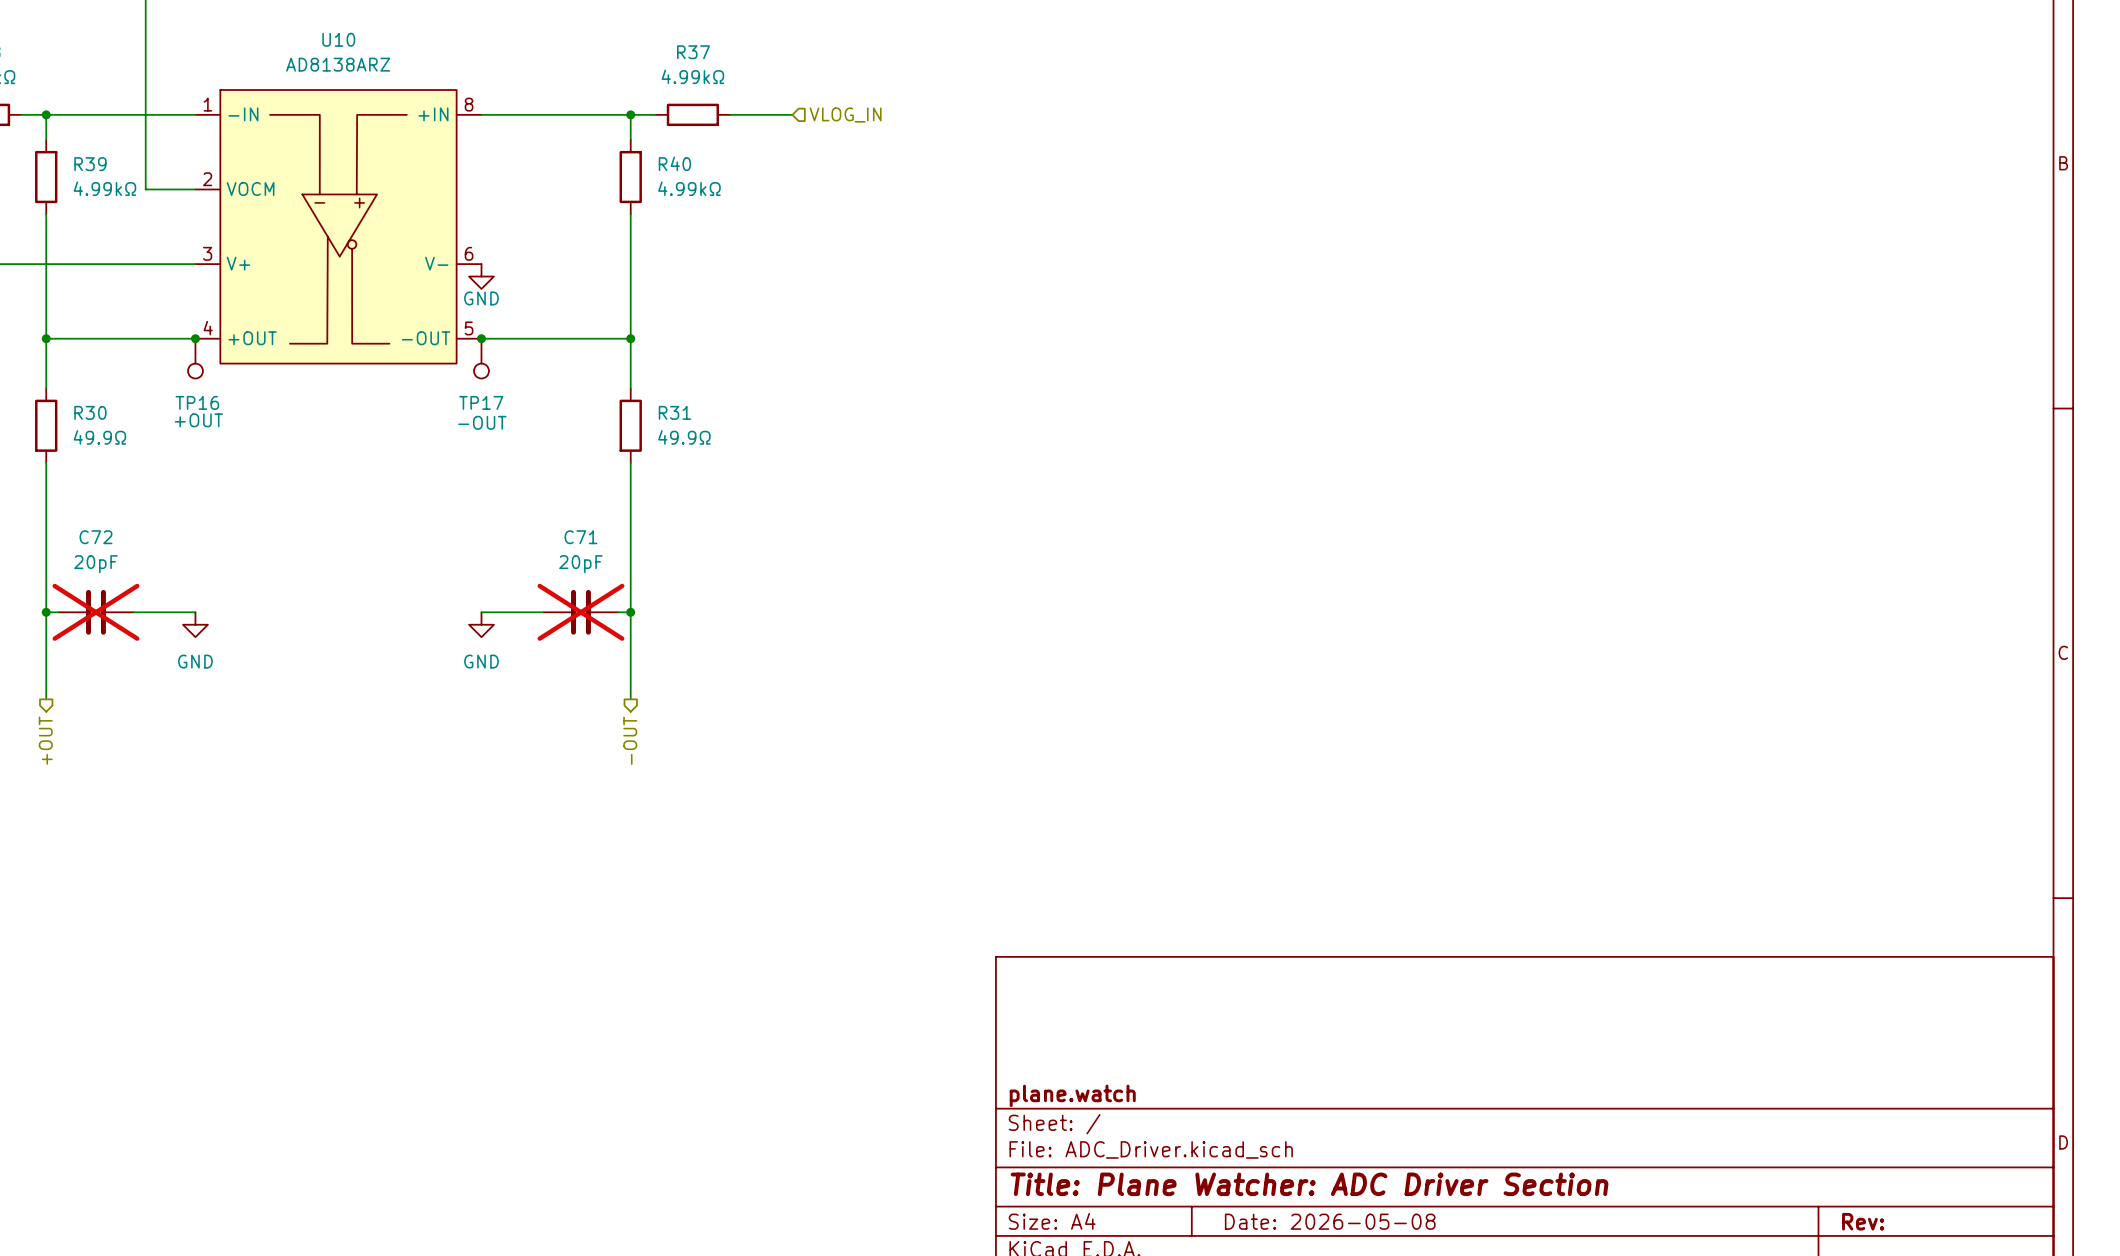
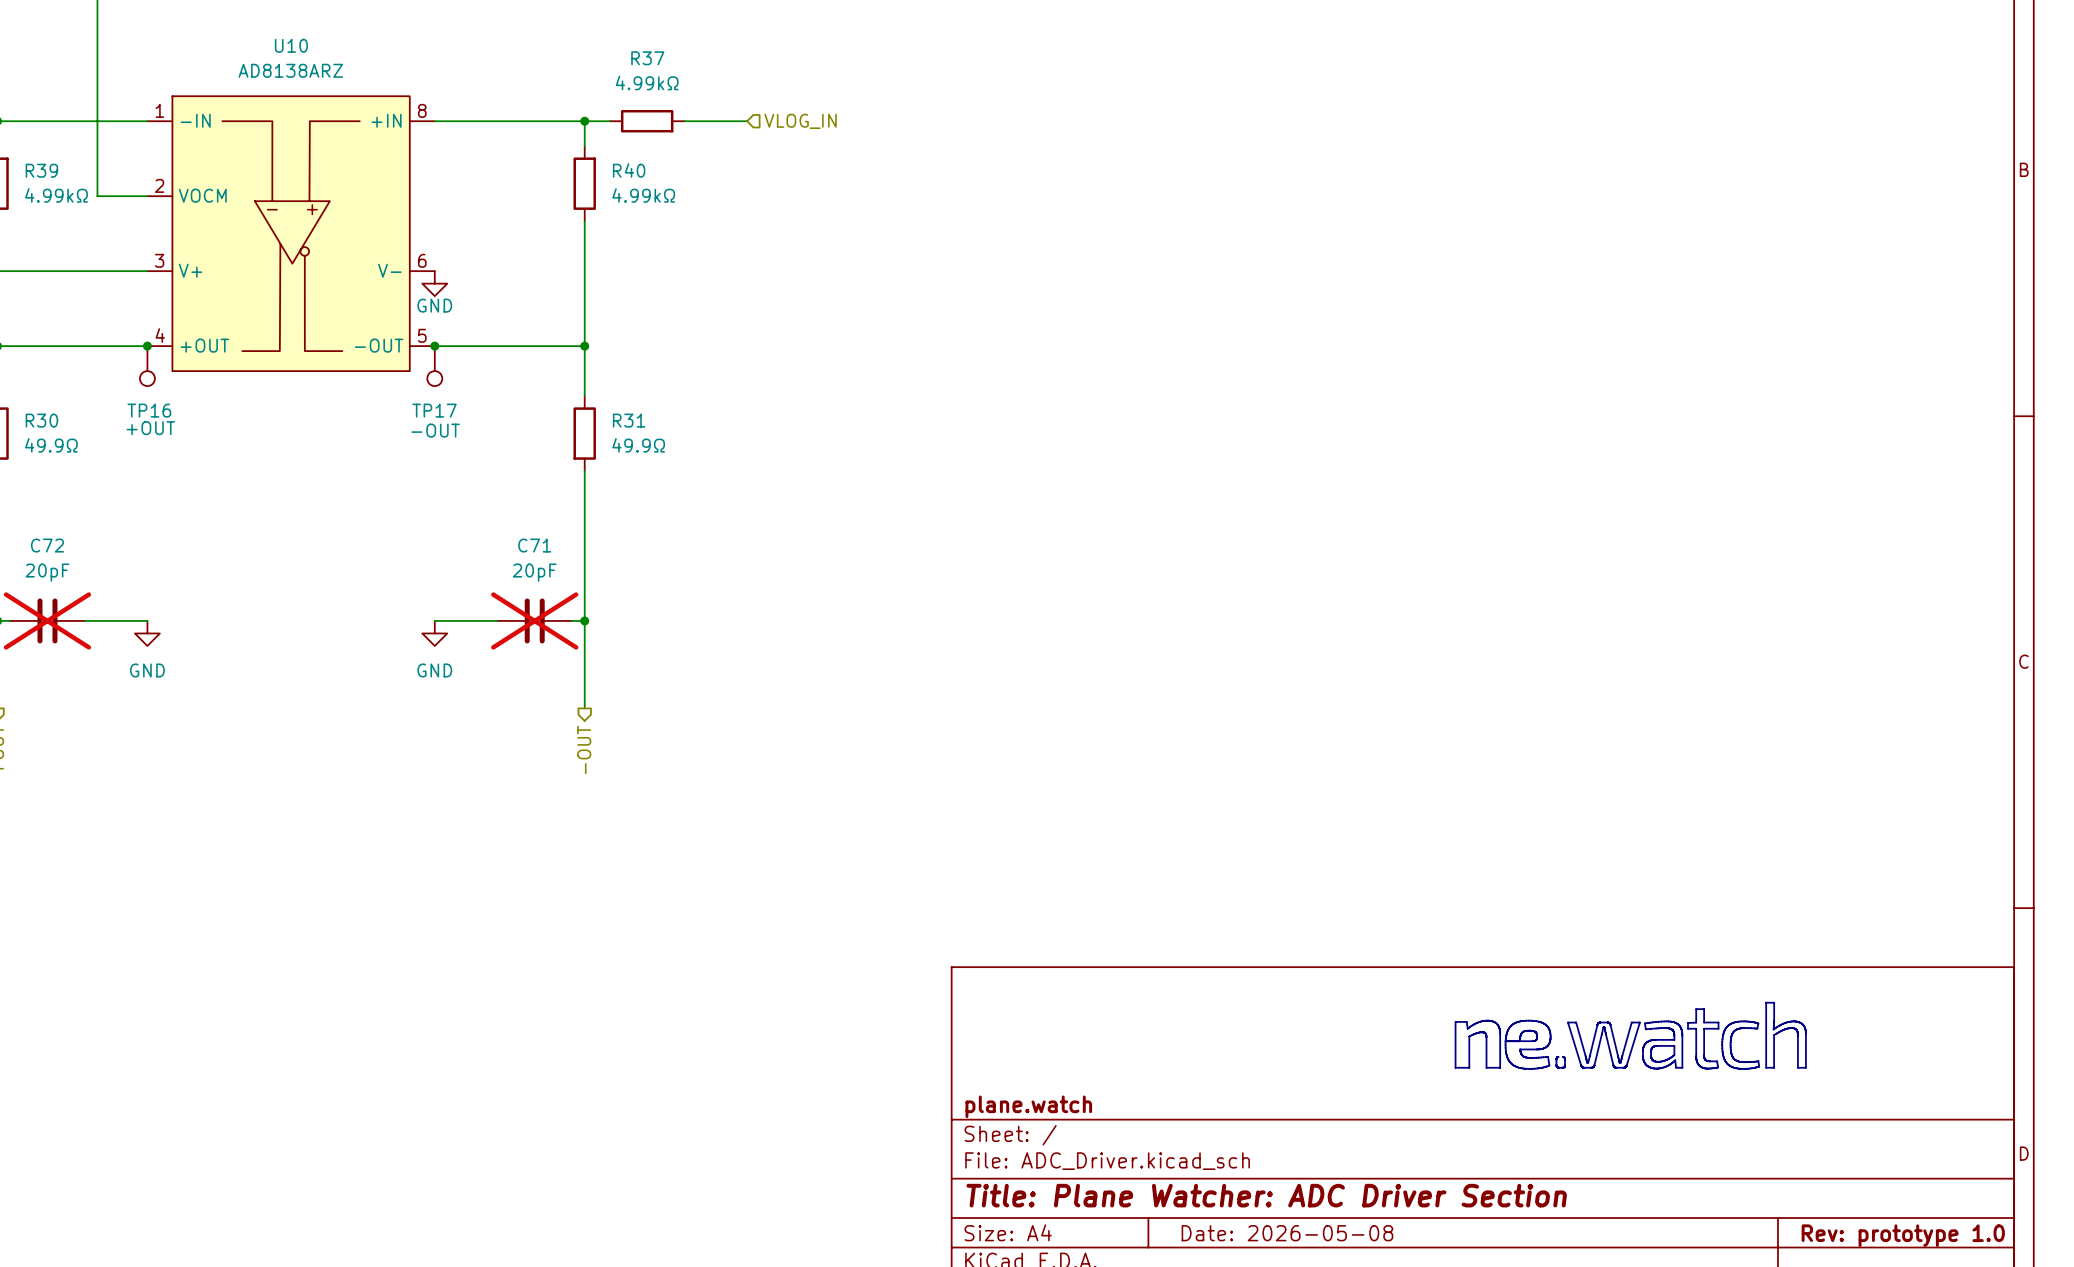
line: none -> (1766, 1002) (1766, 1067) (1774, 1067) (1774, 1035) (1791, 1028) (1795, 1029) (1797, 1033) (1797, 1067) (1805, 1067) (1804, 1026) (1798, 1022) (1791, 1021) (1773, 1029) (1774, 1002) (1766, 1002)
line: none -> (1696, 1009) (1696, 1022) (1688, 1022) (1688, 1028) (1696, 1028) (1697, 1062) (1703, 1068) (1718, 1067) (1717, 1061) (1707, 1061) (1704, 1058) (1704, 1028) (1718, 1028) (1718, 1022) (1704, 1022) (1704, 1009) (1696, 1009)
line: none -> (1486, 1020) (1477, 1022) (1467, 1028) (1466, 1021) (1455, 1021) (1455, 1067) (1469, 1067) (1469, 1036) (1482, 1032) (1486, 1035) (1486, 1067) (1500, 1067) (1499, 1028) (1495, 1022) (1486, 1020)
line: none -> (1666, 1021) (1645, 1023) (1645, 1029) (1668, 1028) (1674, 1033) (1674, 1039) (1652, 1040) (1644, 1044) (1643, 1060) (1651, 1067) (1663, 1067) (1675, 1060) (1676, 1067) (1682, 1067) (1681, 1029) (1676, 1023) (1666, 1021)
line: none -> (1743, 1021) (1731, 1023) (1724, 1029) (1722, 1041) (1724, 1058) (1728, 1064) (1735, 1068) (1759, 1066) (1758, 1061) (1738, 1061) (1731, 1054) (1730, 1040) (1734, 1031) (1741, 1028) (1757, 1028) (1758, 1023) (1743, 1021)
line: none -> (1600, 1022) (1607, 1022)
line: none -> (1610, 1024) (1620, 1062) (1631, 1022) (1639, 1022) (1626, 1065)
line: none -> (1597, 1025) (1587, 1062) (1576, 1022) (1567, 1022) (1581, 1065)
line: none -> (1505, 1041) (1507, 1056) (1514, 1065) (1529, 1068) (1549, 1065) (1548, 1056) (1526, 1057) (1522, 1055) (1520, 1050) (1540, 1049) (1547, 1045) (1550, 1032) (1543, 1023) (1528, 1020) (1515, 1023) (1508, 1029) (1505, 1041)
line: none -> (1505, 1041) (1532, 1041) (1534, 1041) (1536, 1038) (1536, 1033) (1532, 1030) (1523, 1031) (1521, 1034) (1520, 1037) (1520, 1038) (1519, 1039) (1519, 1041)
line: none -> (1656, 1045) (1674, 1045) (1674, 1055) (1663, 1060) (1654, 1061) (1651, 1057) (1651, 1050) (1656, 1045)
line: none -> (1556, 1059) (1556, 1065)
line: none -> (1564, 1059) (1564, 1065)
line: none -> (1594, 1065) (1603, 1027) (1613, 1065)
line: none -> (1581, 1066) (1591, 1067)
line: none -> (1558, 1067) (1562, 1067)
line: none -> (1616, 1067) (1623, 1067)
title block: Rev: (1863, 1221) -> Rev: prototype 1.0 (1903, 1235)

